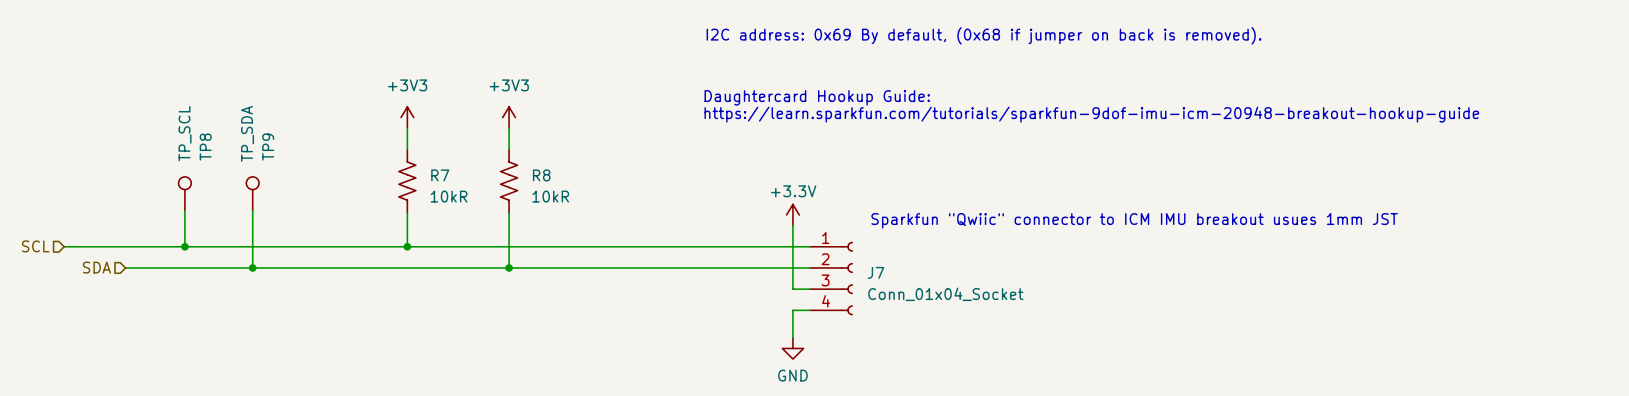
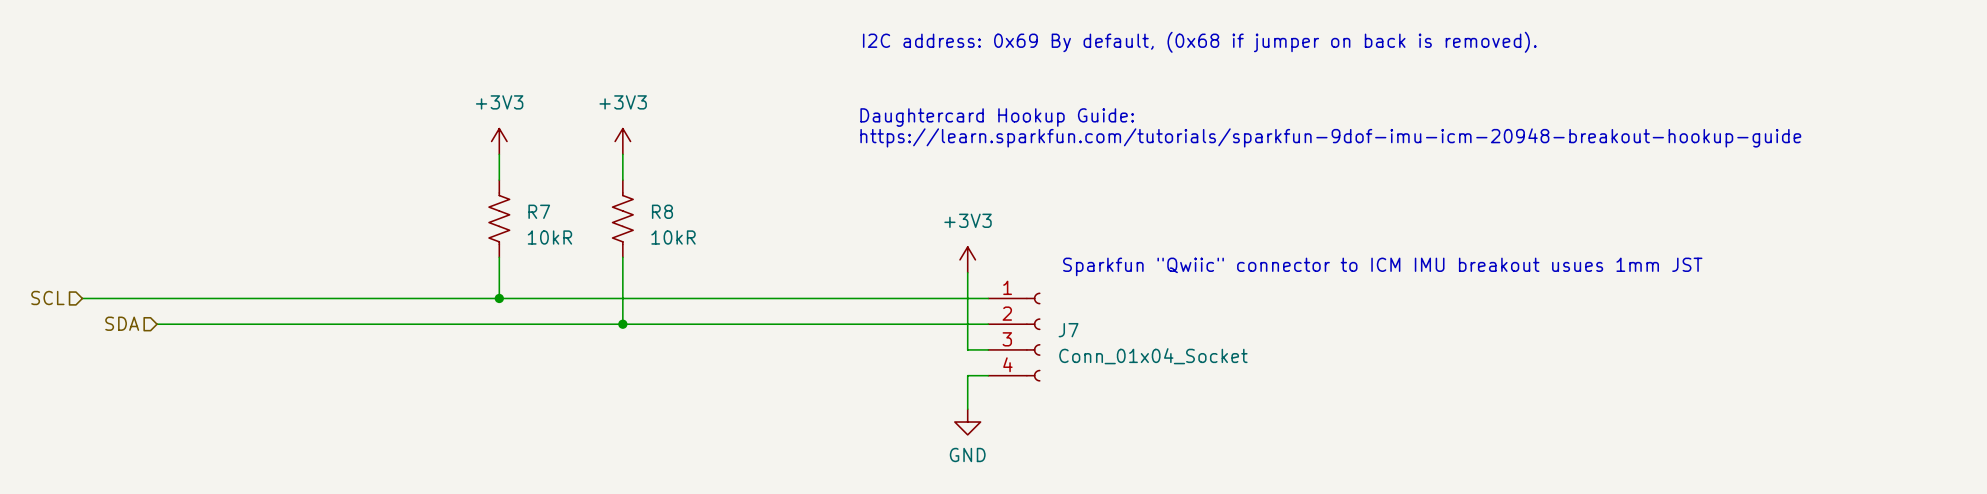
TP8: TP_SCL (184, 193) -> none
TP9: TP_SDA (252, 193) -> none
wire: (184, 210) (184, 246) -> none
wire: (252, 210) (252, 267) -> none
power symbol: +3.3V (792, 215) -> +3V3 (967, 259)
junction: (184, 246) -> none
junction: (252, 267) -> none

